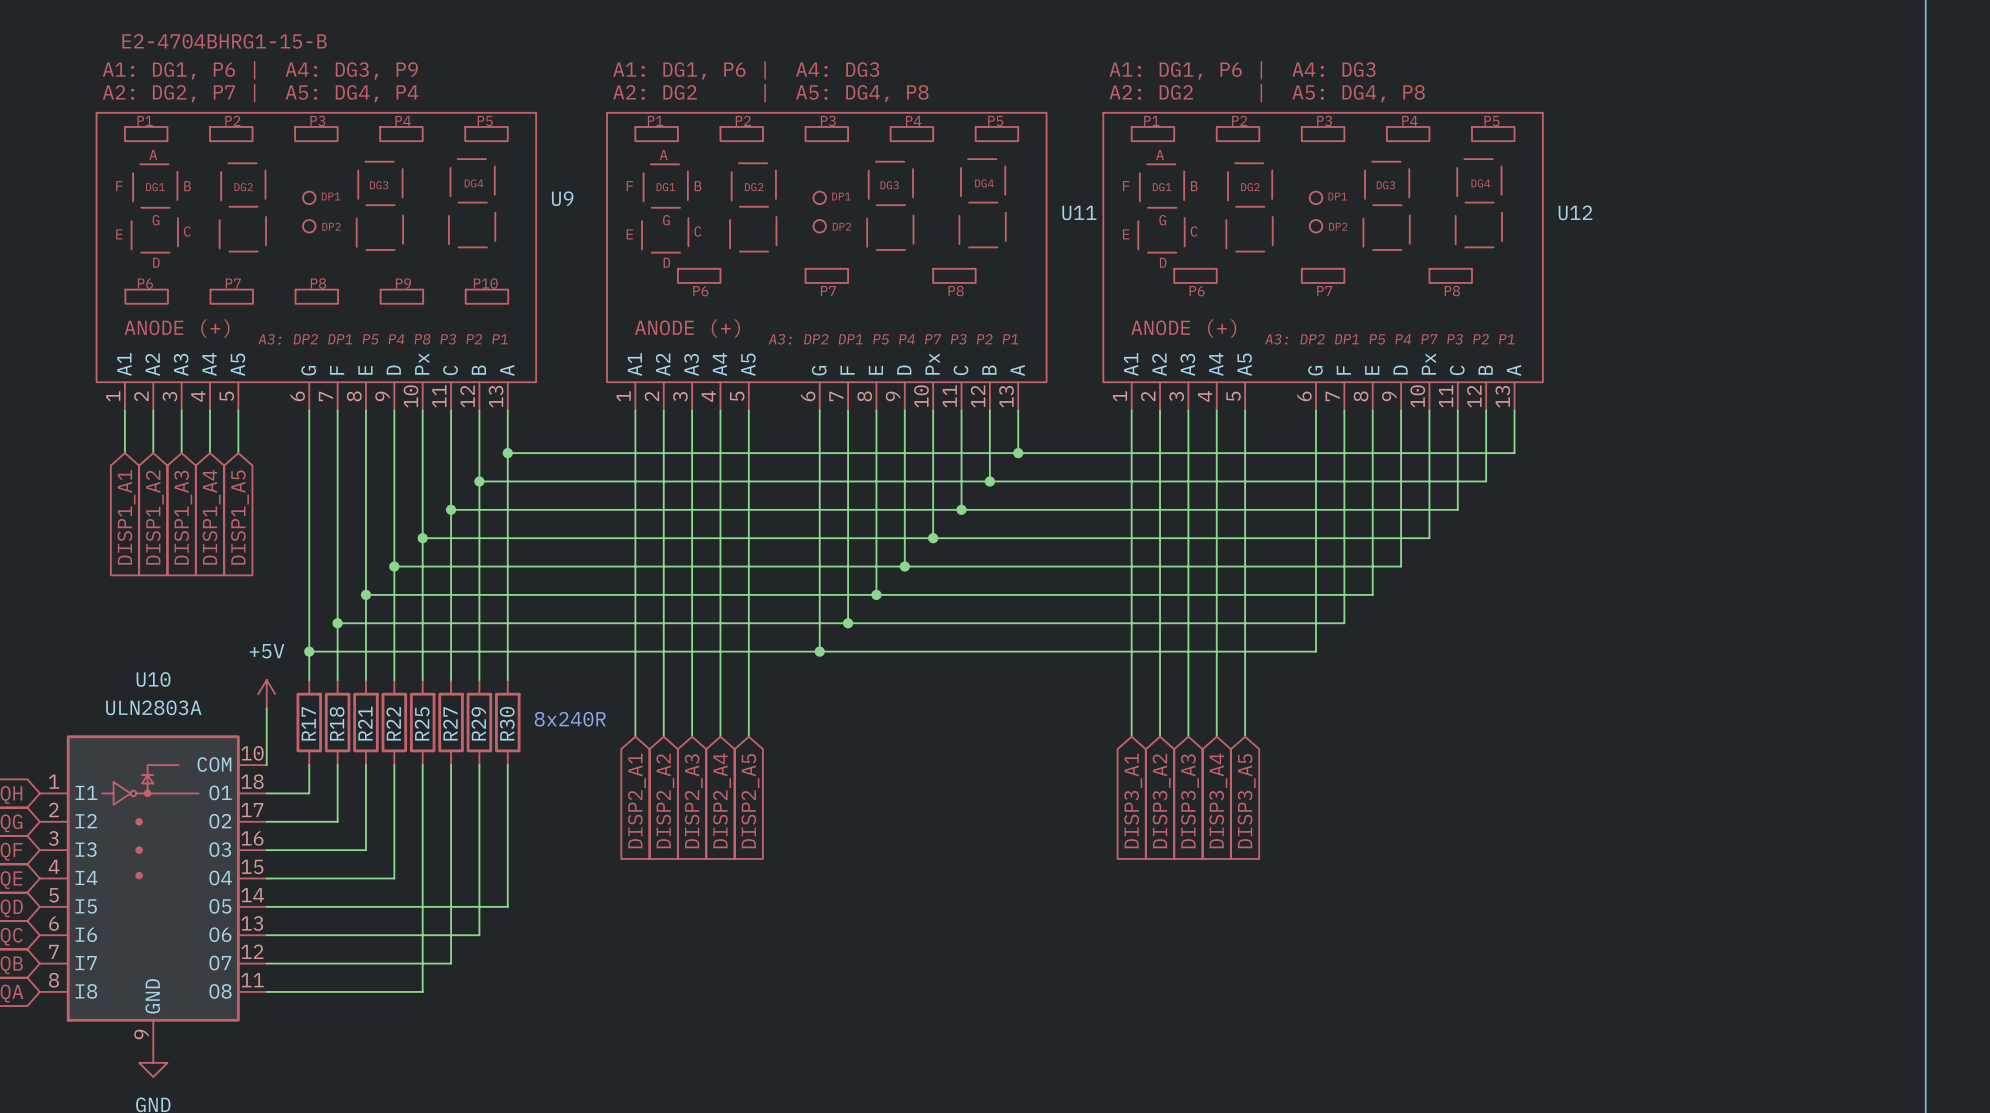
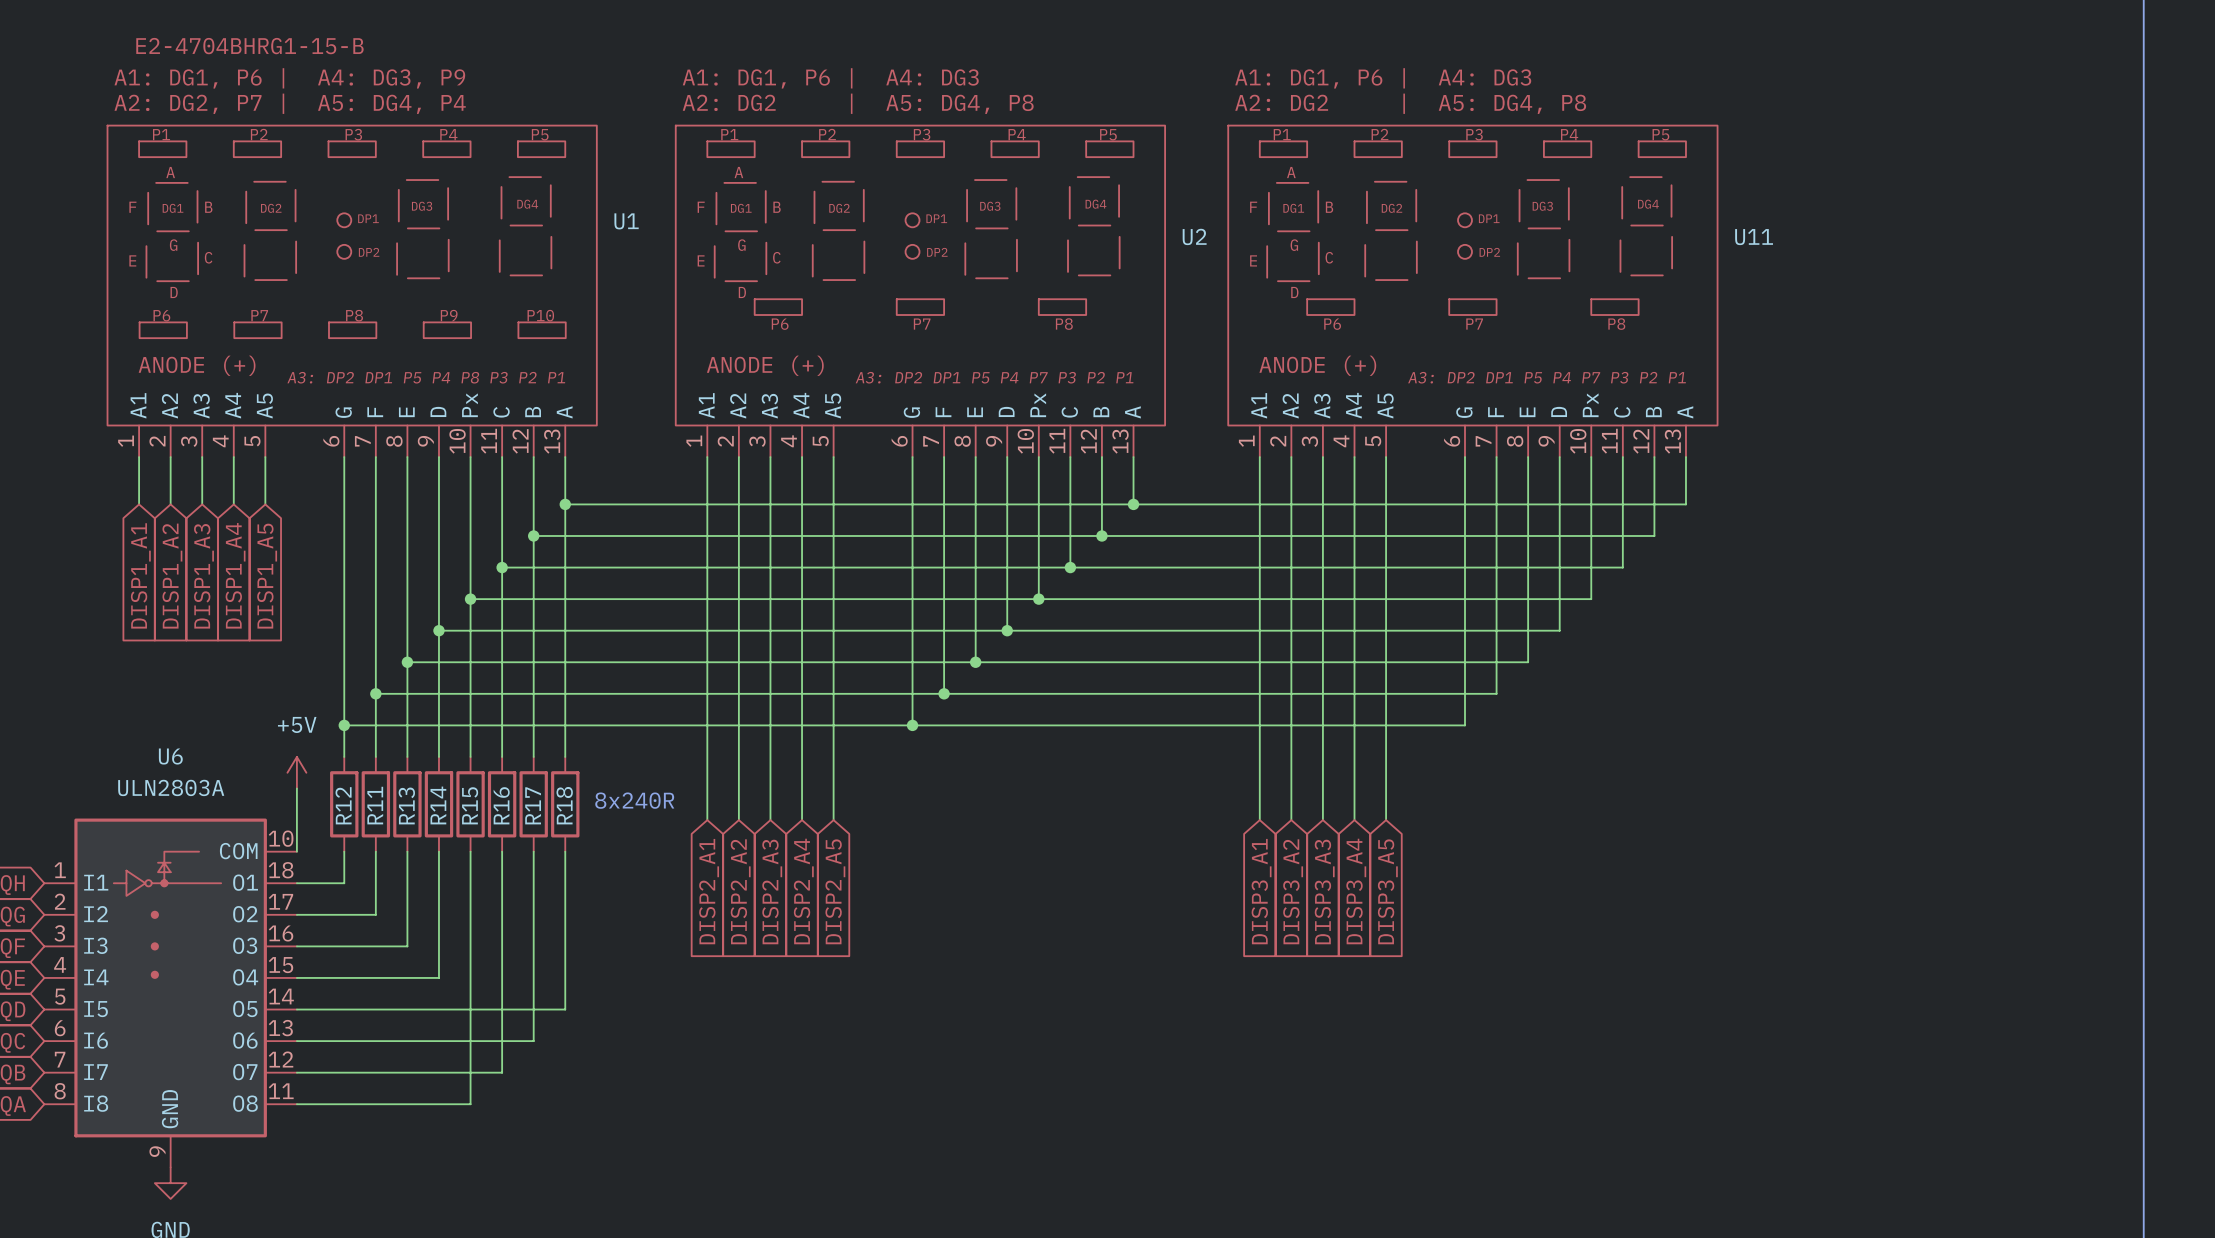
U9 name: U9 (562, 198) -> U1 (626, 221)
U11 name: U11 (1079, 212) -> U2 (1194, 236)
U12 name: U12 (1575, 212) -> U11 (1754, 237)
U10 name: U10 (153, 679) -> U6 (170, 756)
R17 name: R17 (308, 723) -> R12 (343, 805)
R18 name: R18 (337, 723) -> R11 (375, 805)
R21 name: R21 (365, 723) -> R13 (406, 805)
R22 name: R22 (393, 723) -> R14 (438, 805)
R25 name: R25 (422, 723) -> R15 (470, 805)
R27 name: R27 (450, 723) -> R16 (501, 805)
R29 name: R29 (478, 723) -> R17 (533, 805)
R30 name: R30 (507, 723) -> R18 (564, 805)

